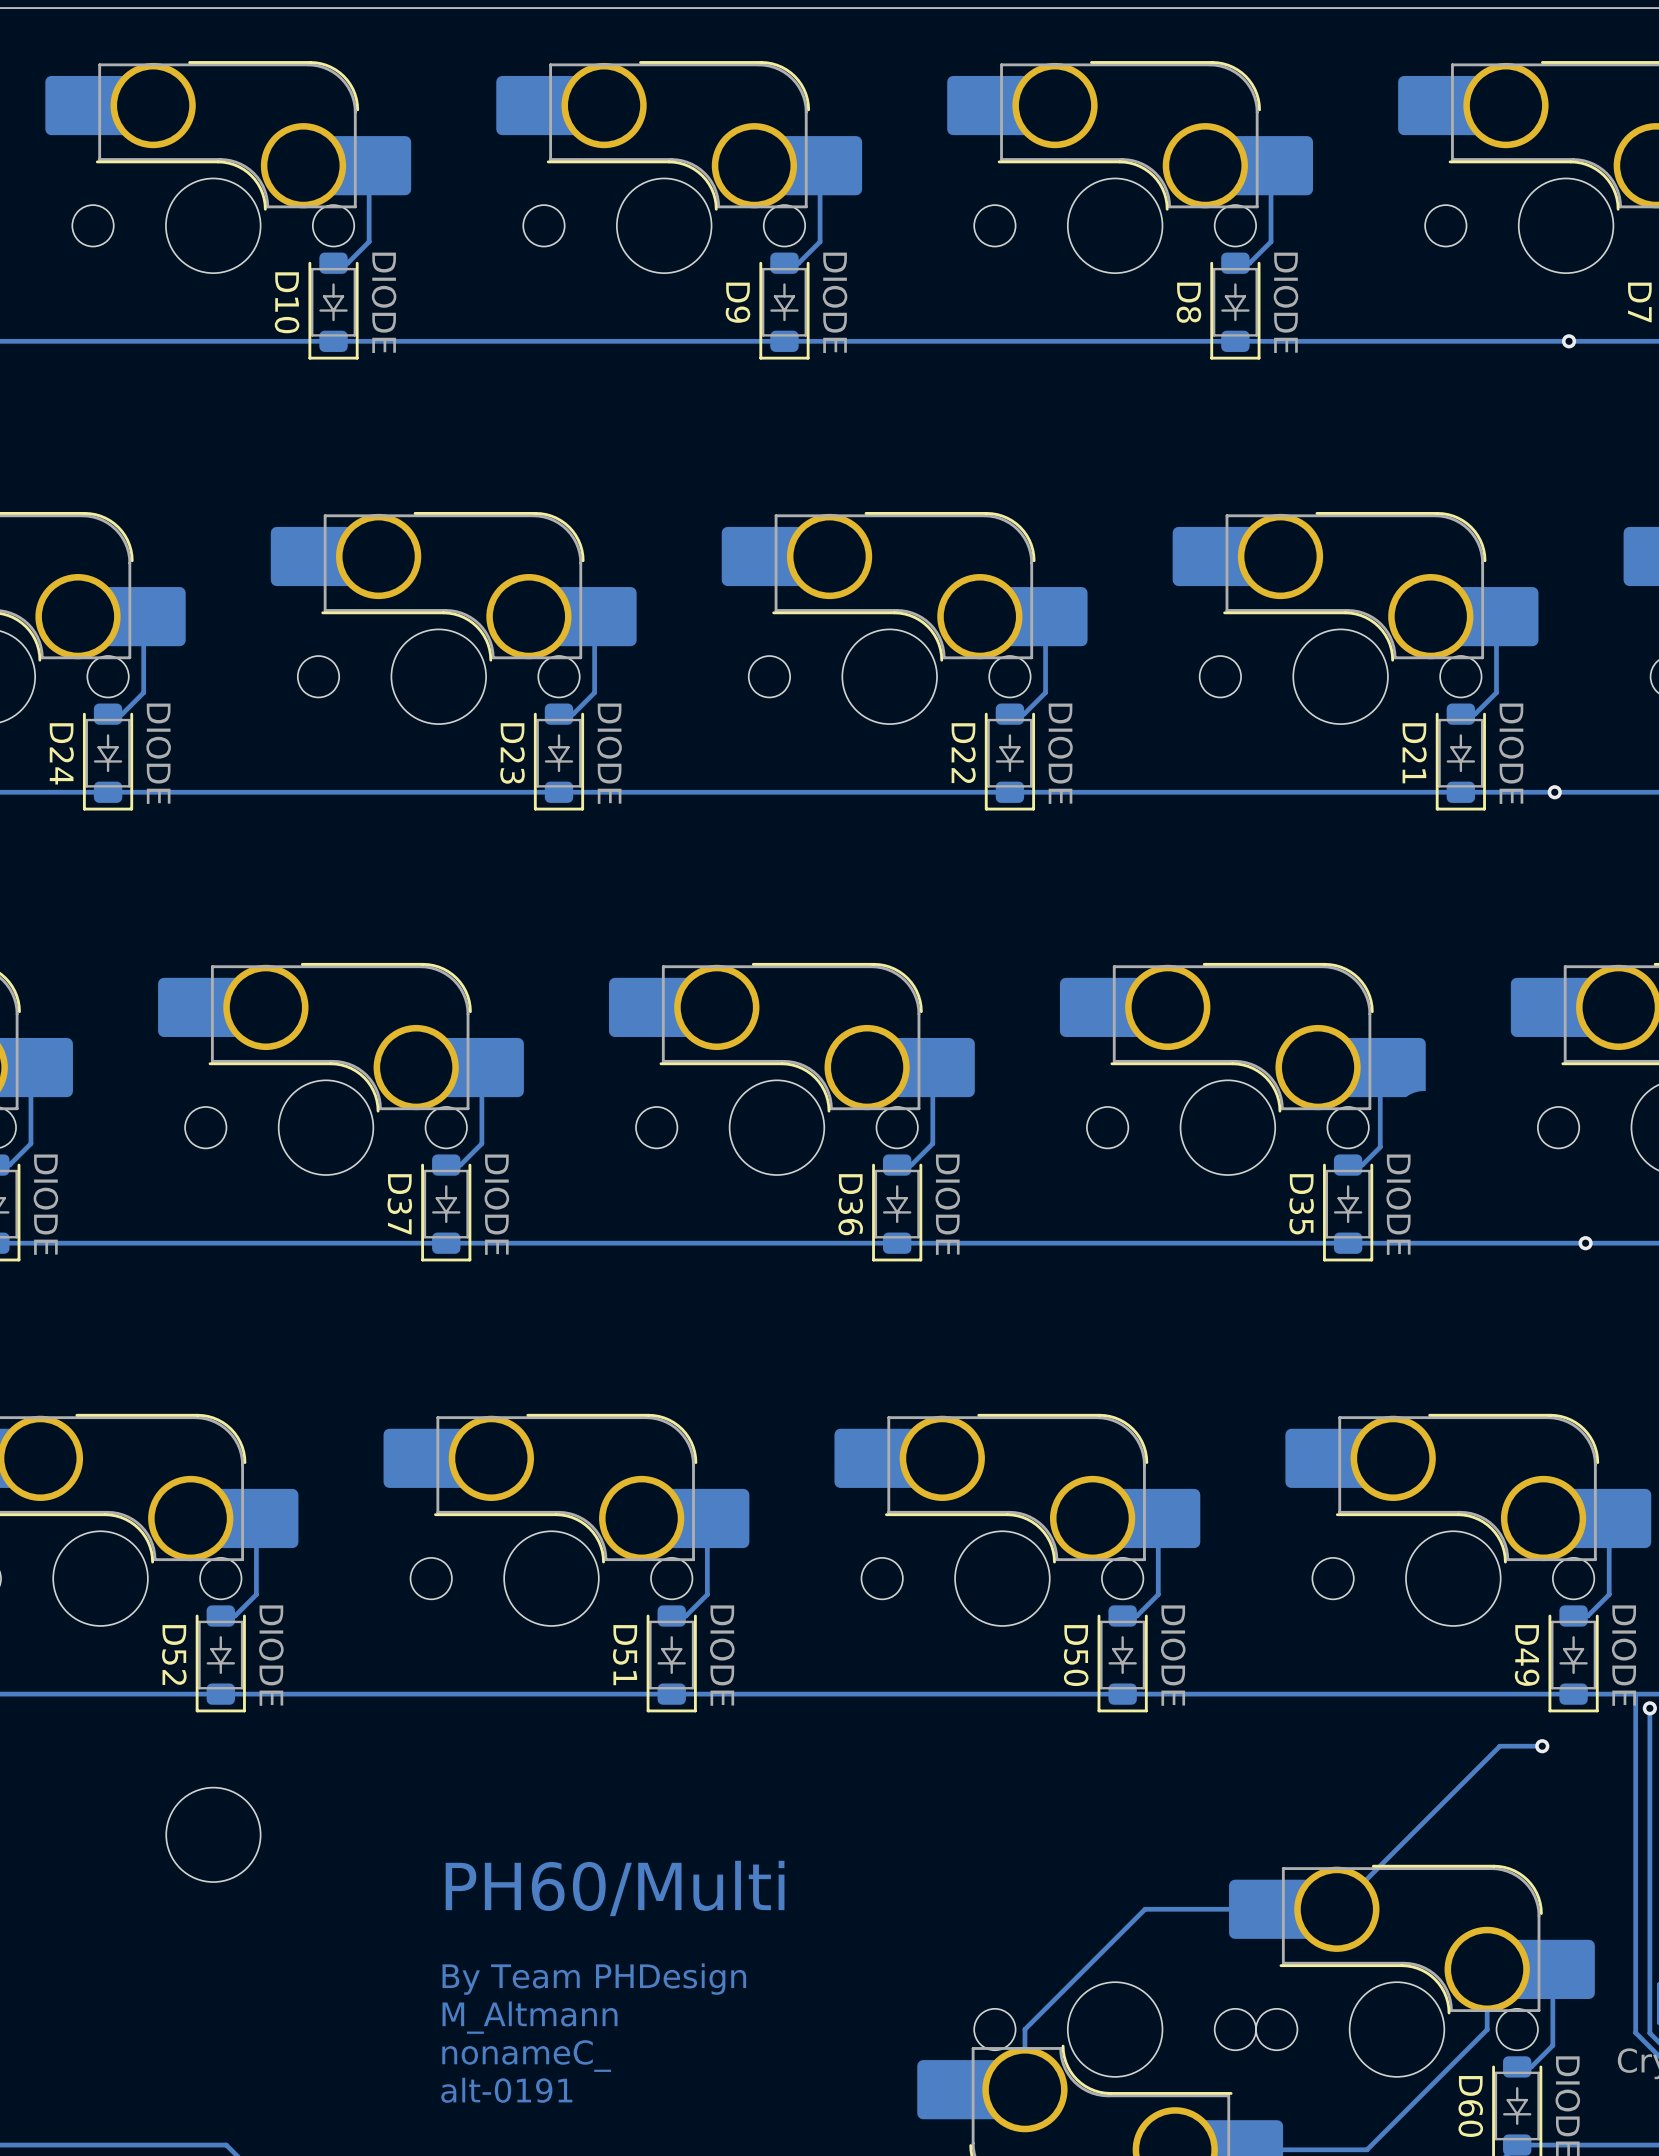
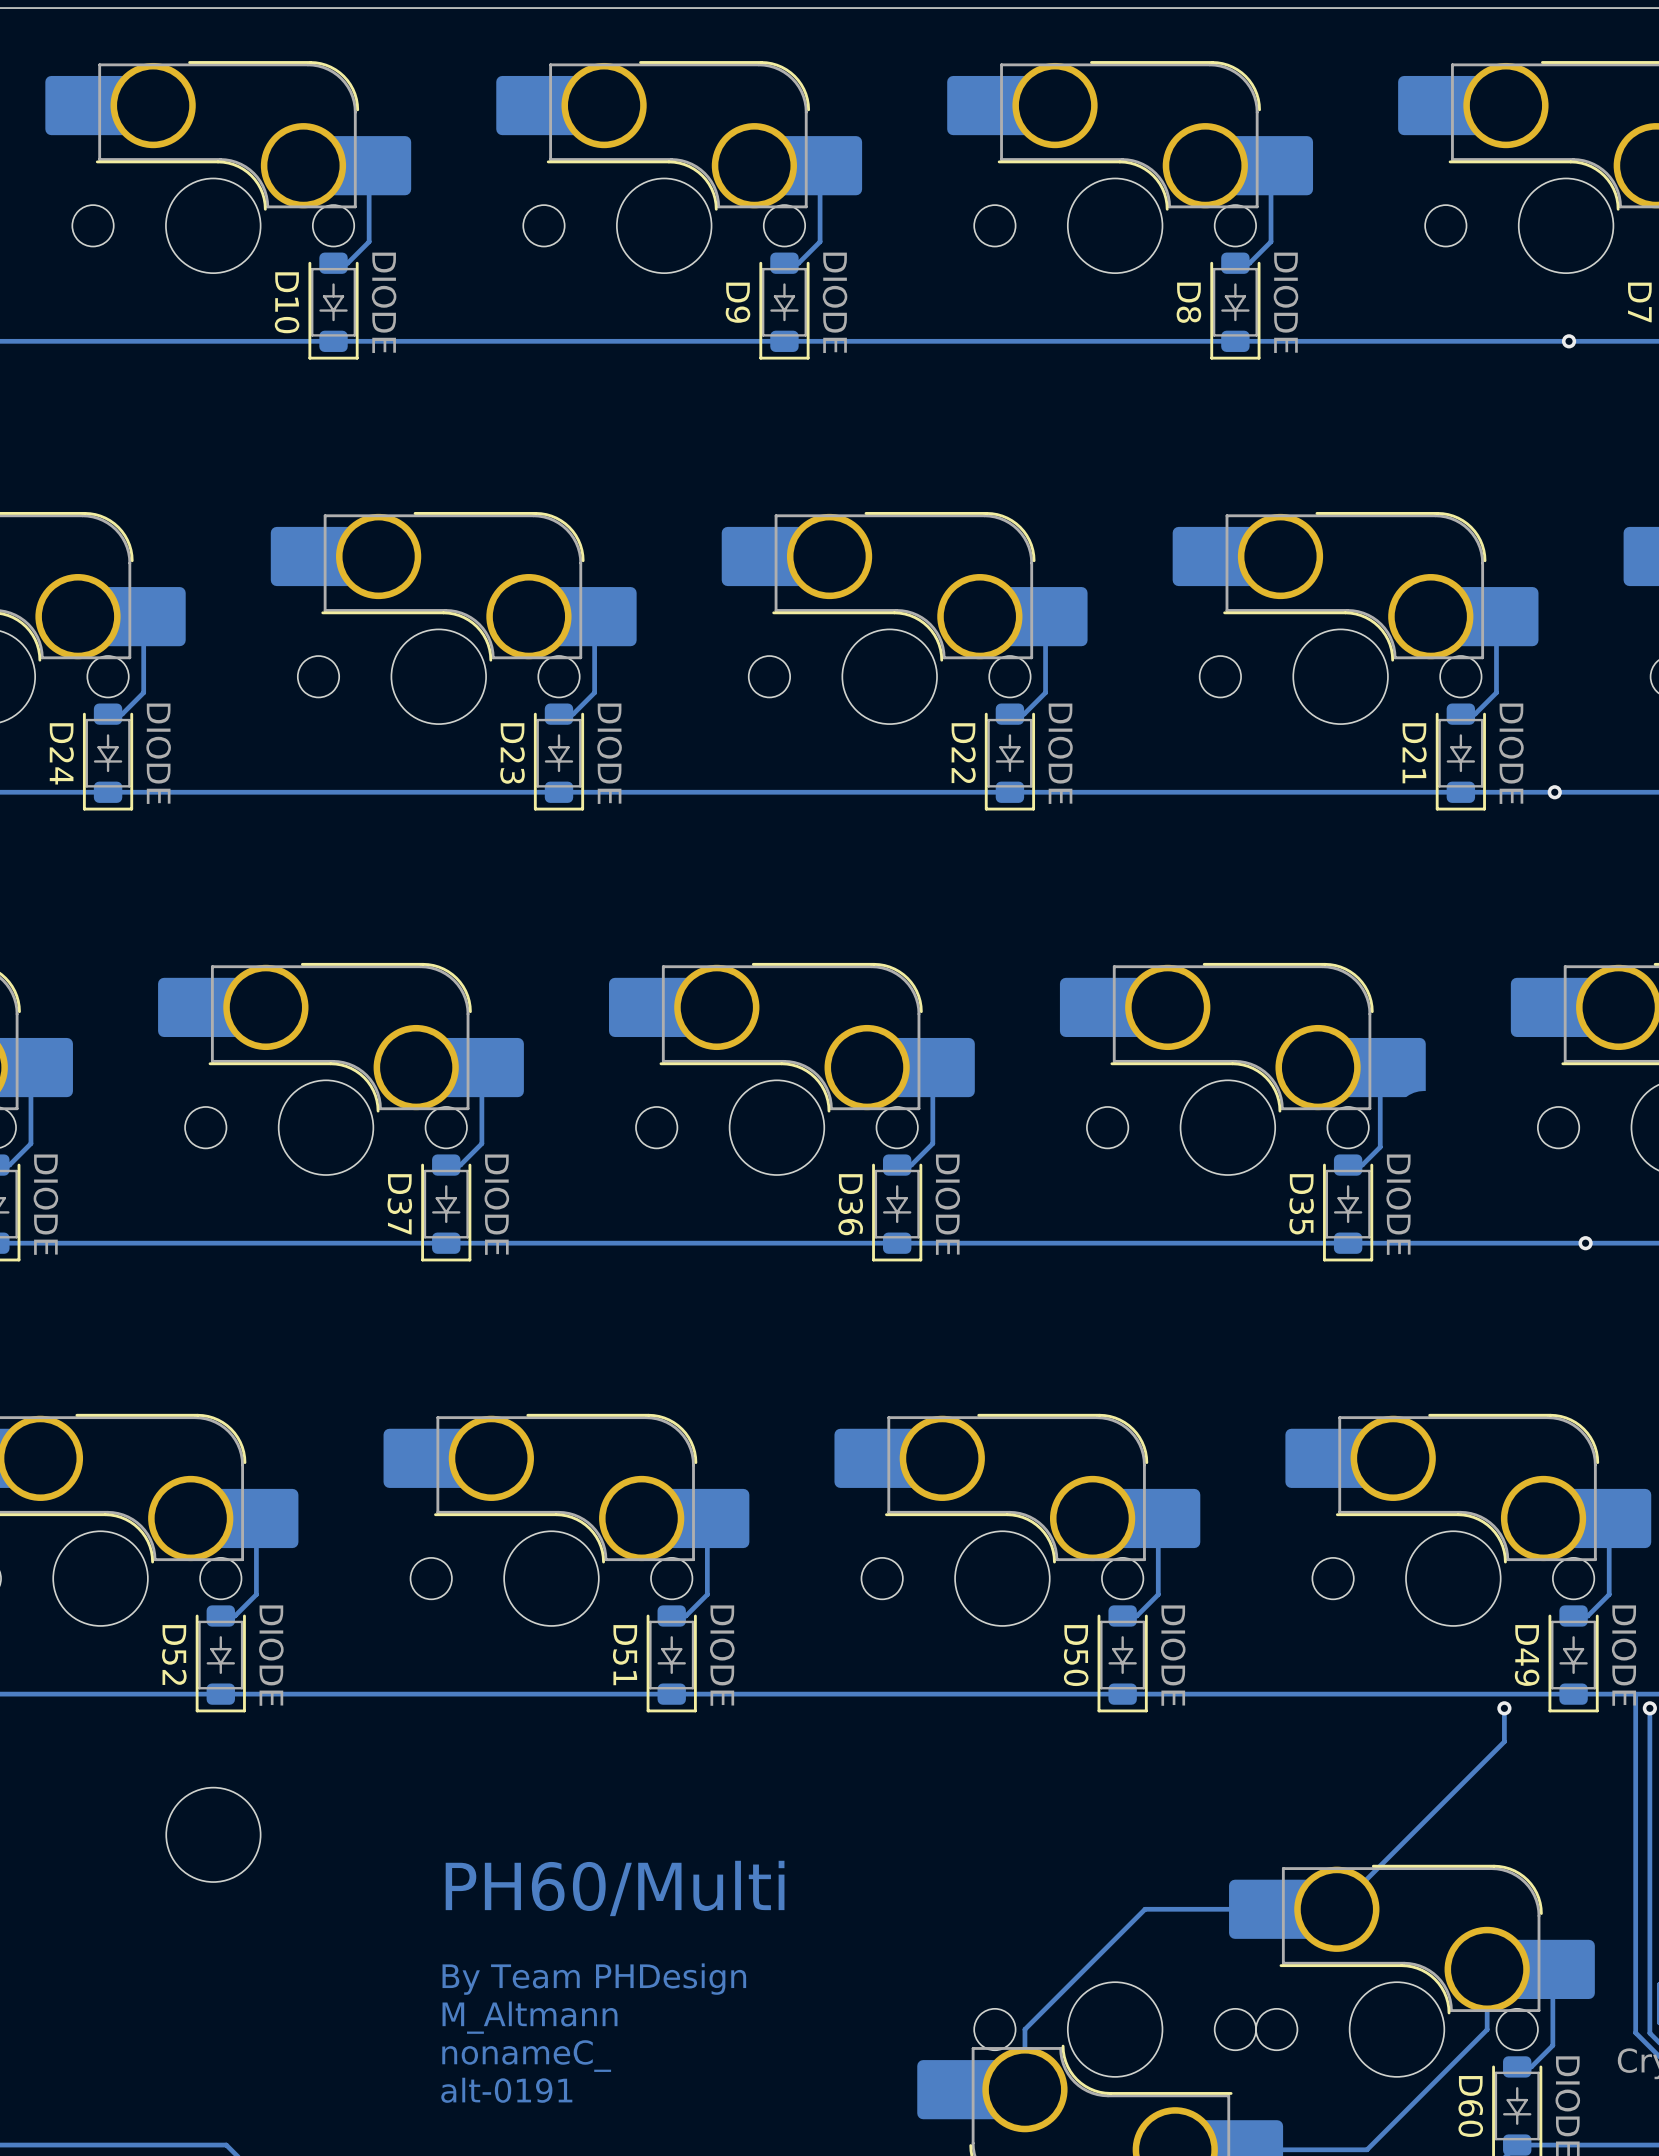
track: (1542, 1746) (1499, 1746) -> (1504, 1708) (1504, 1741) (1499, 1746)
via position: (1542, 1746) -> (1504, 1708)

